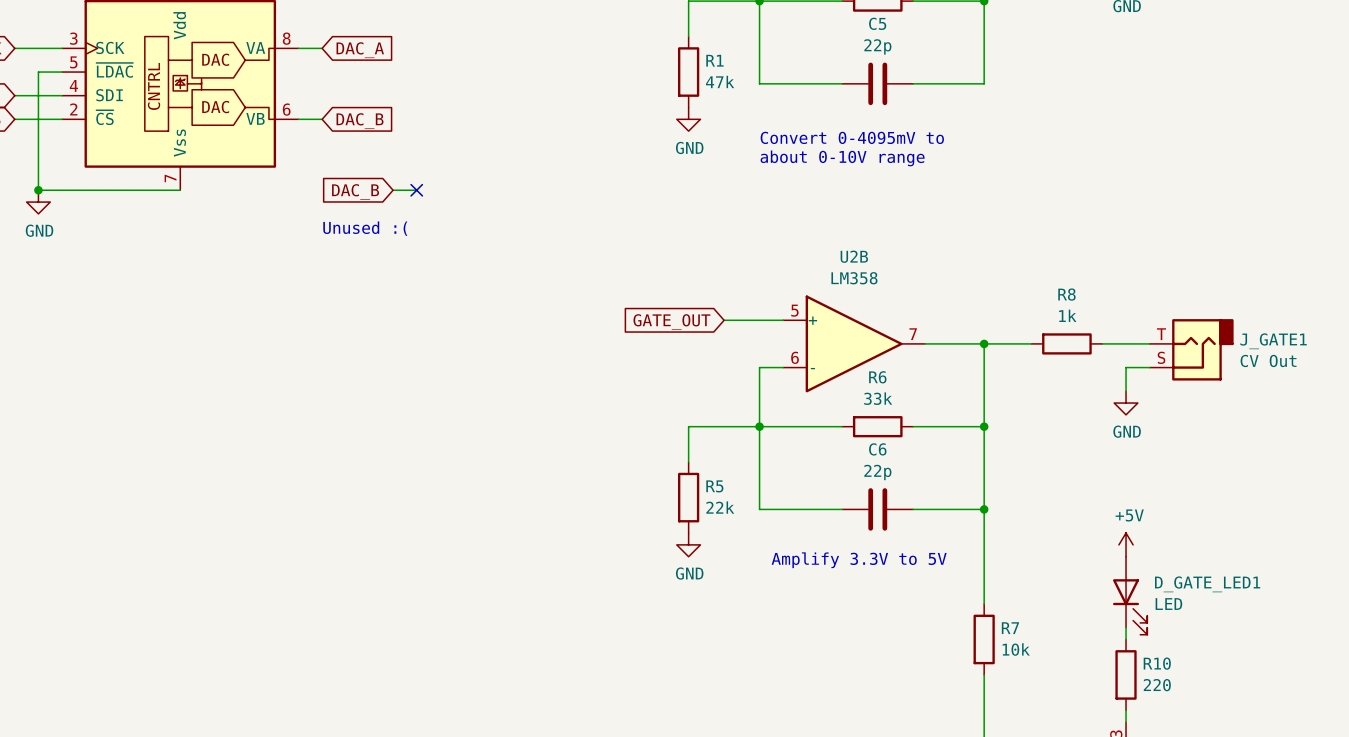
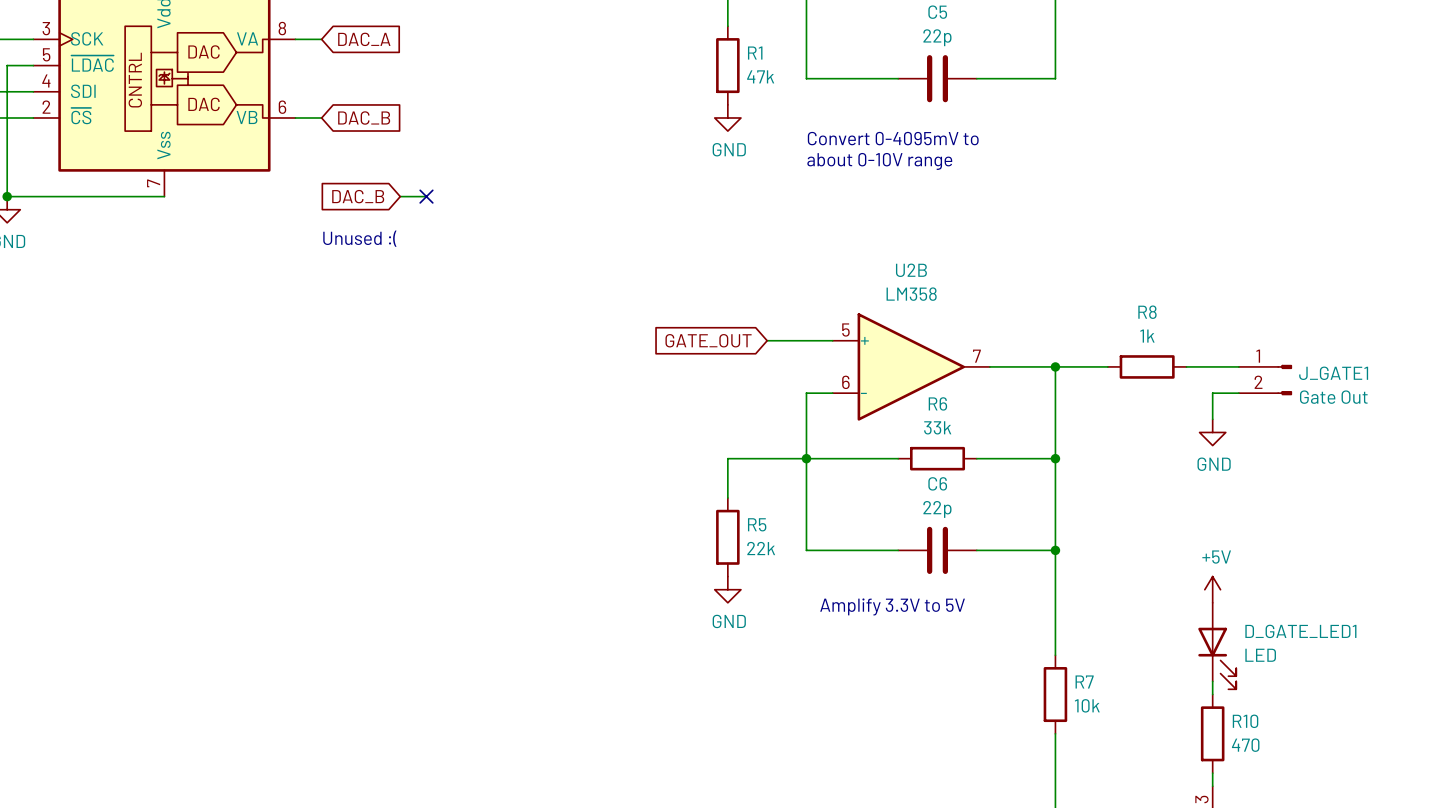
J_GATE1 symbol: [1149, 319, 1234, 381] -> [1238, 364, 1293, 396]
J_GATE1 value: CV Out (1268, 360) -> Gate Out (1333, 397)
R10 value: 220 (1157, 685) -> 470 (1245, 745)

